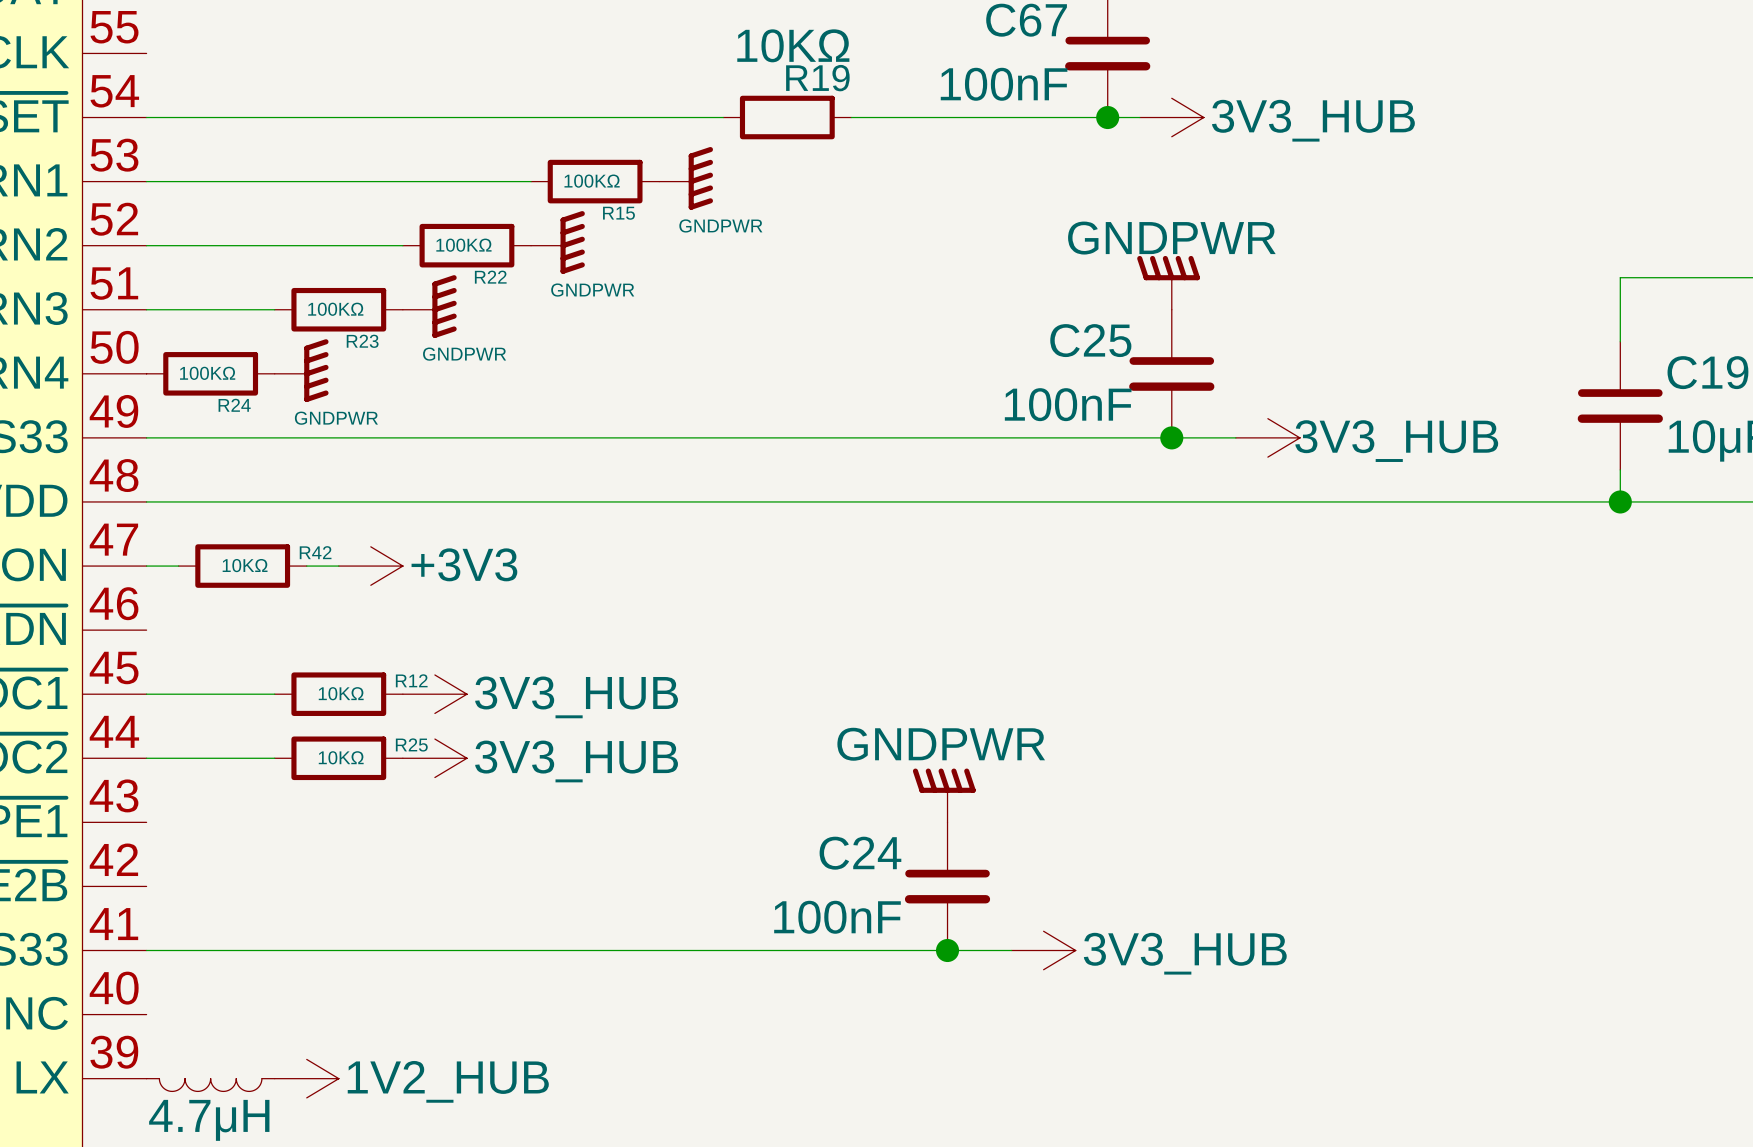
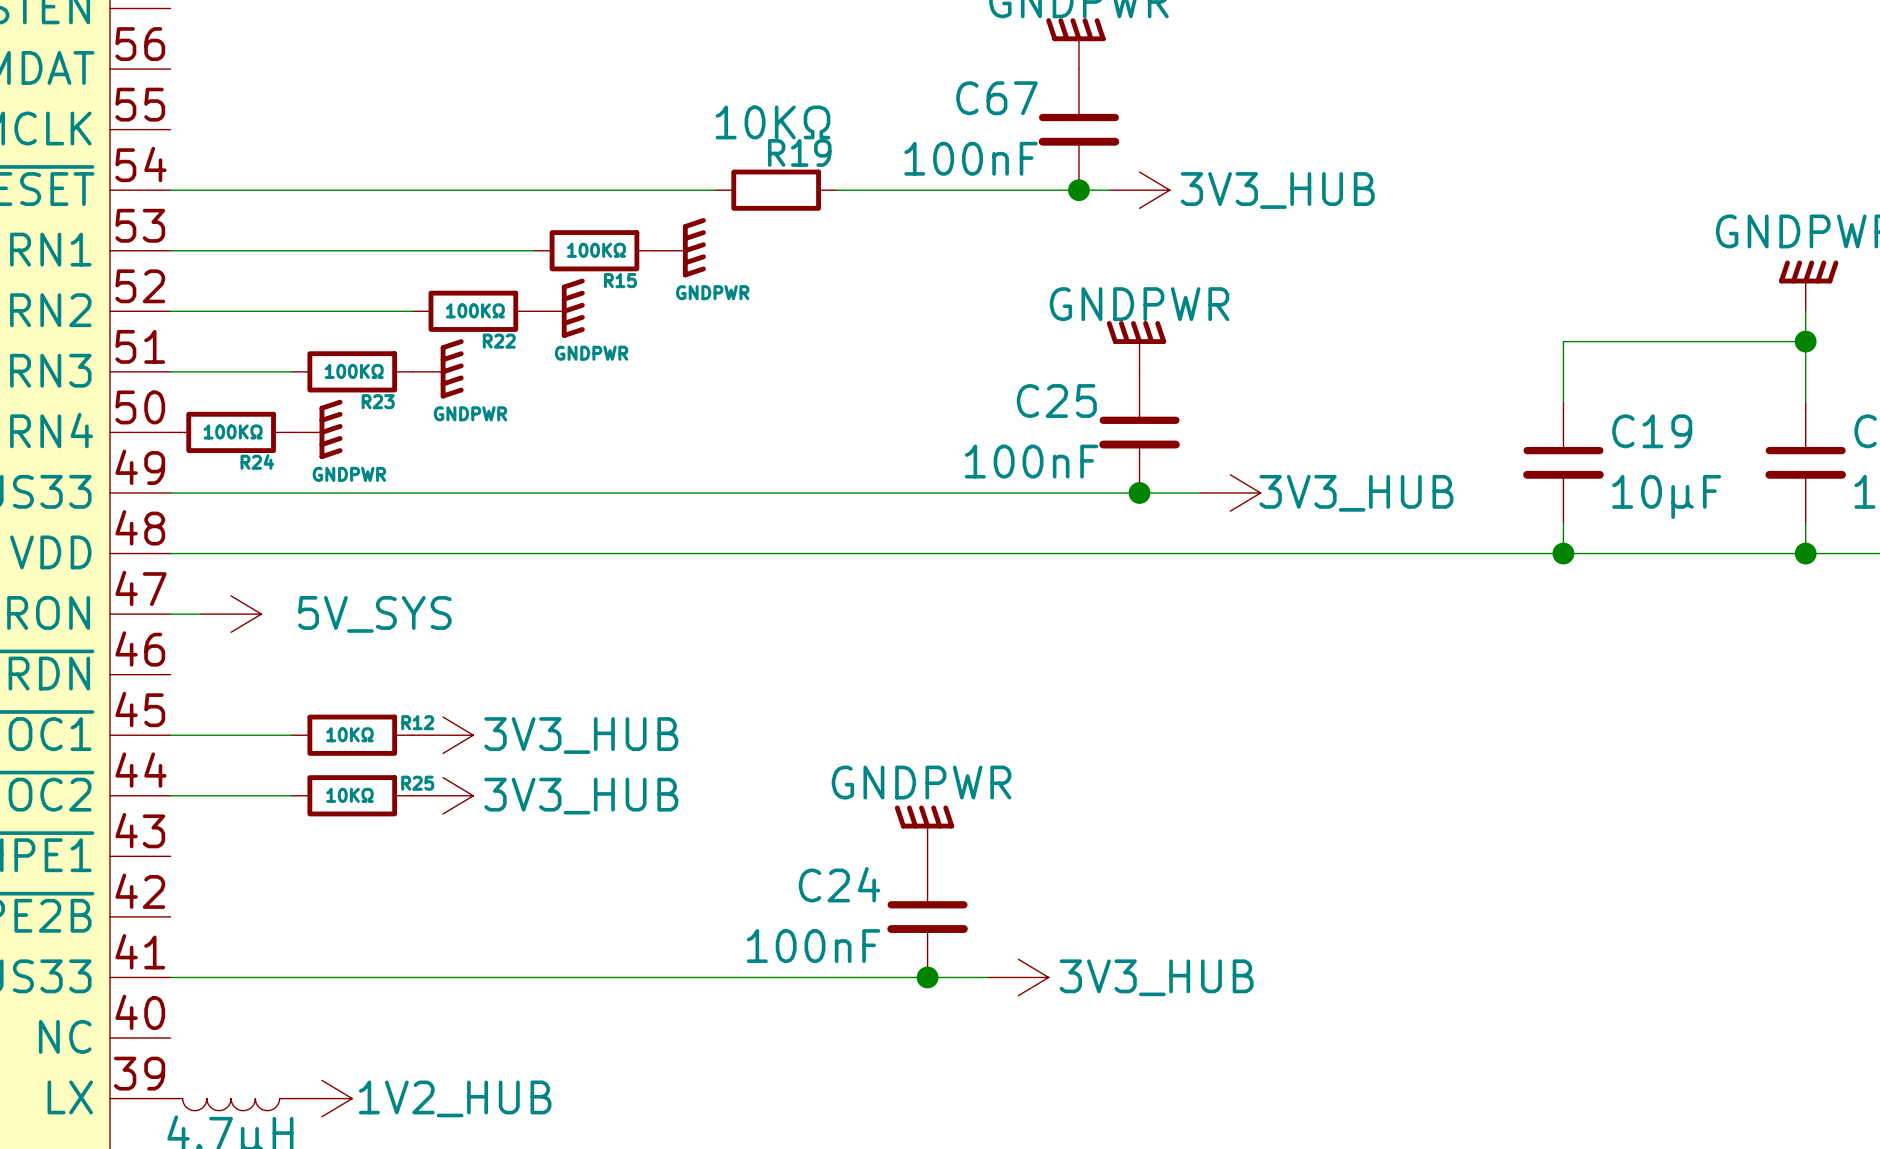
power symbol: none -> 5V_SYS (231, 614)
R42: 10KΩ (242, 566) -> none
wire: (306, 566) (338, 566) -> none
power symbol: +3V3 (370, 566) -> none

